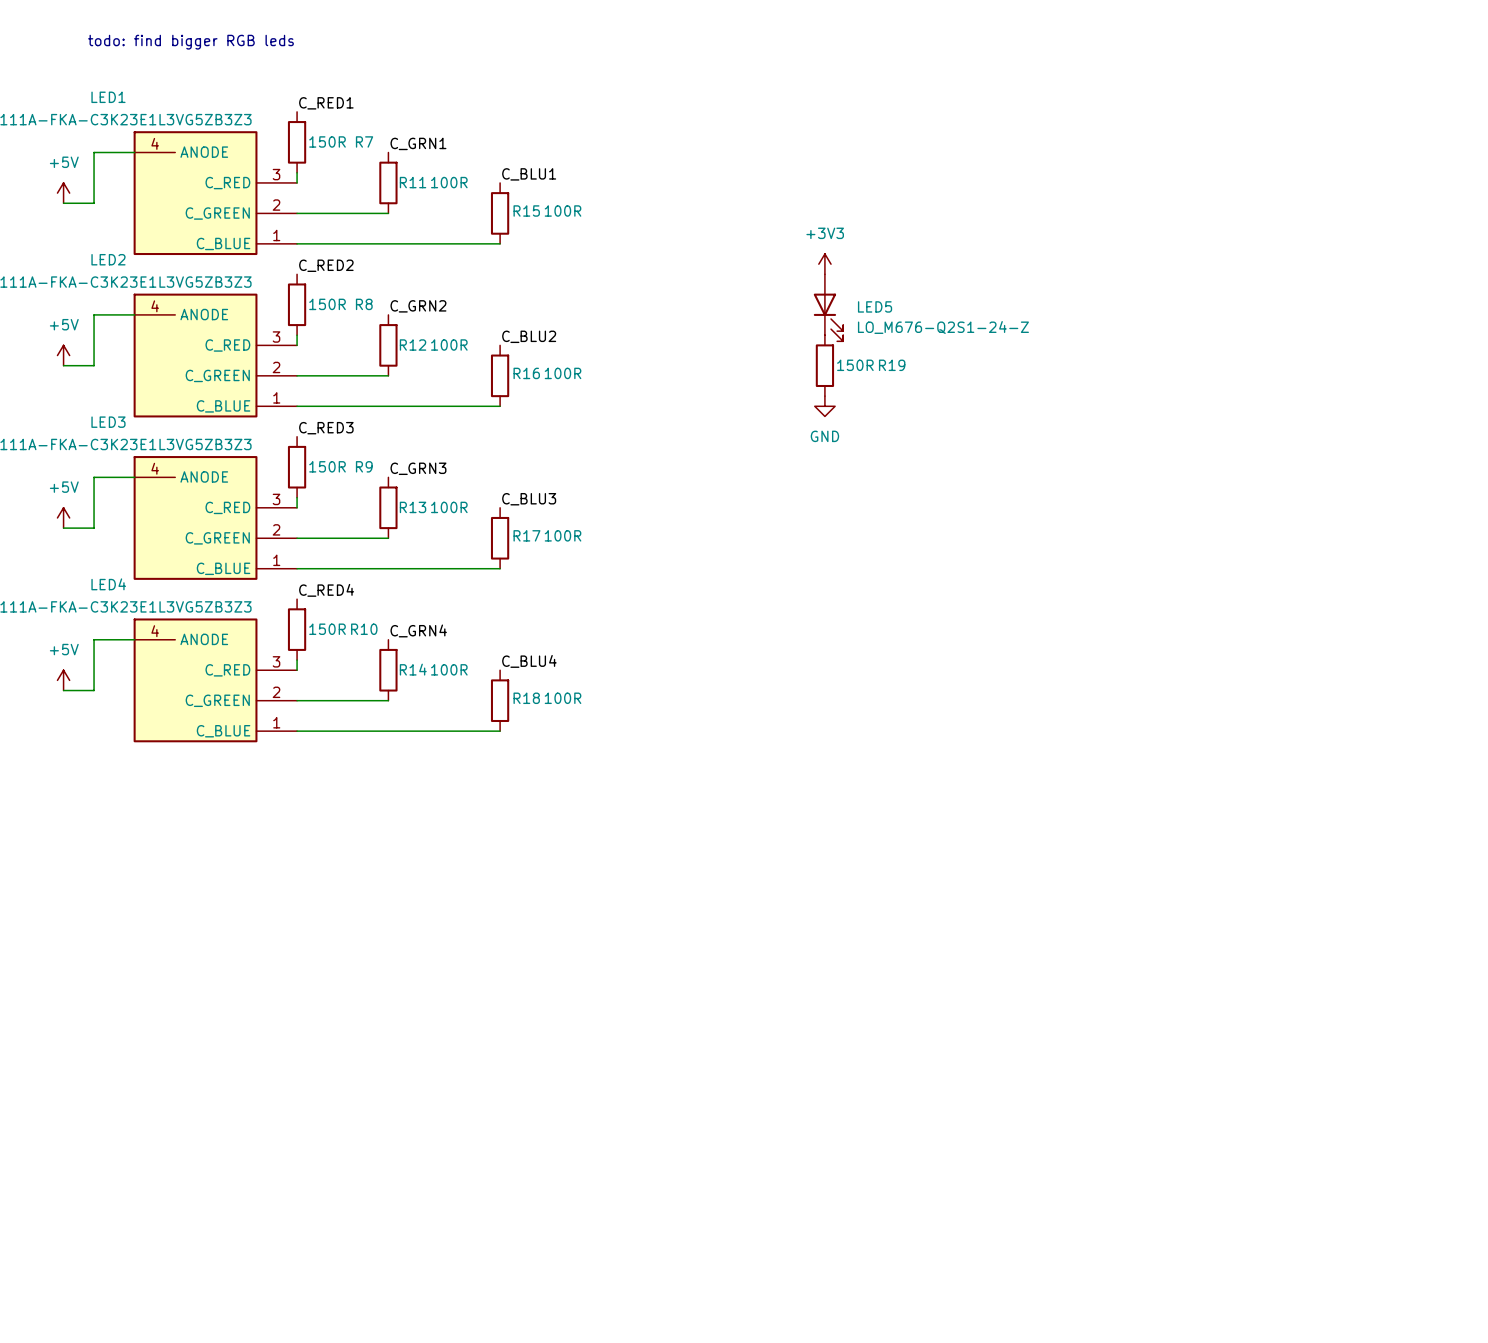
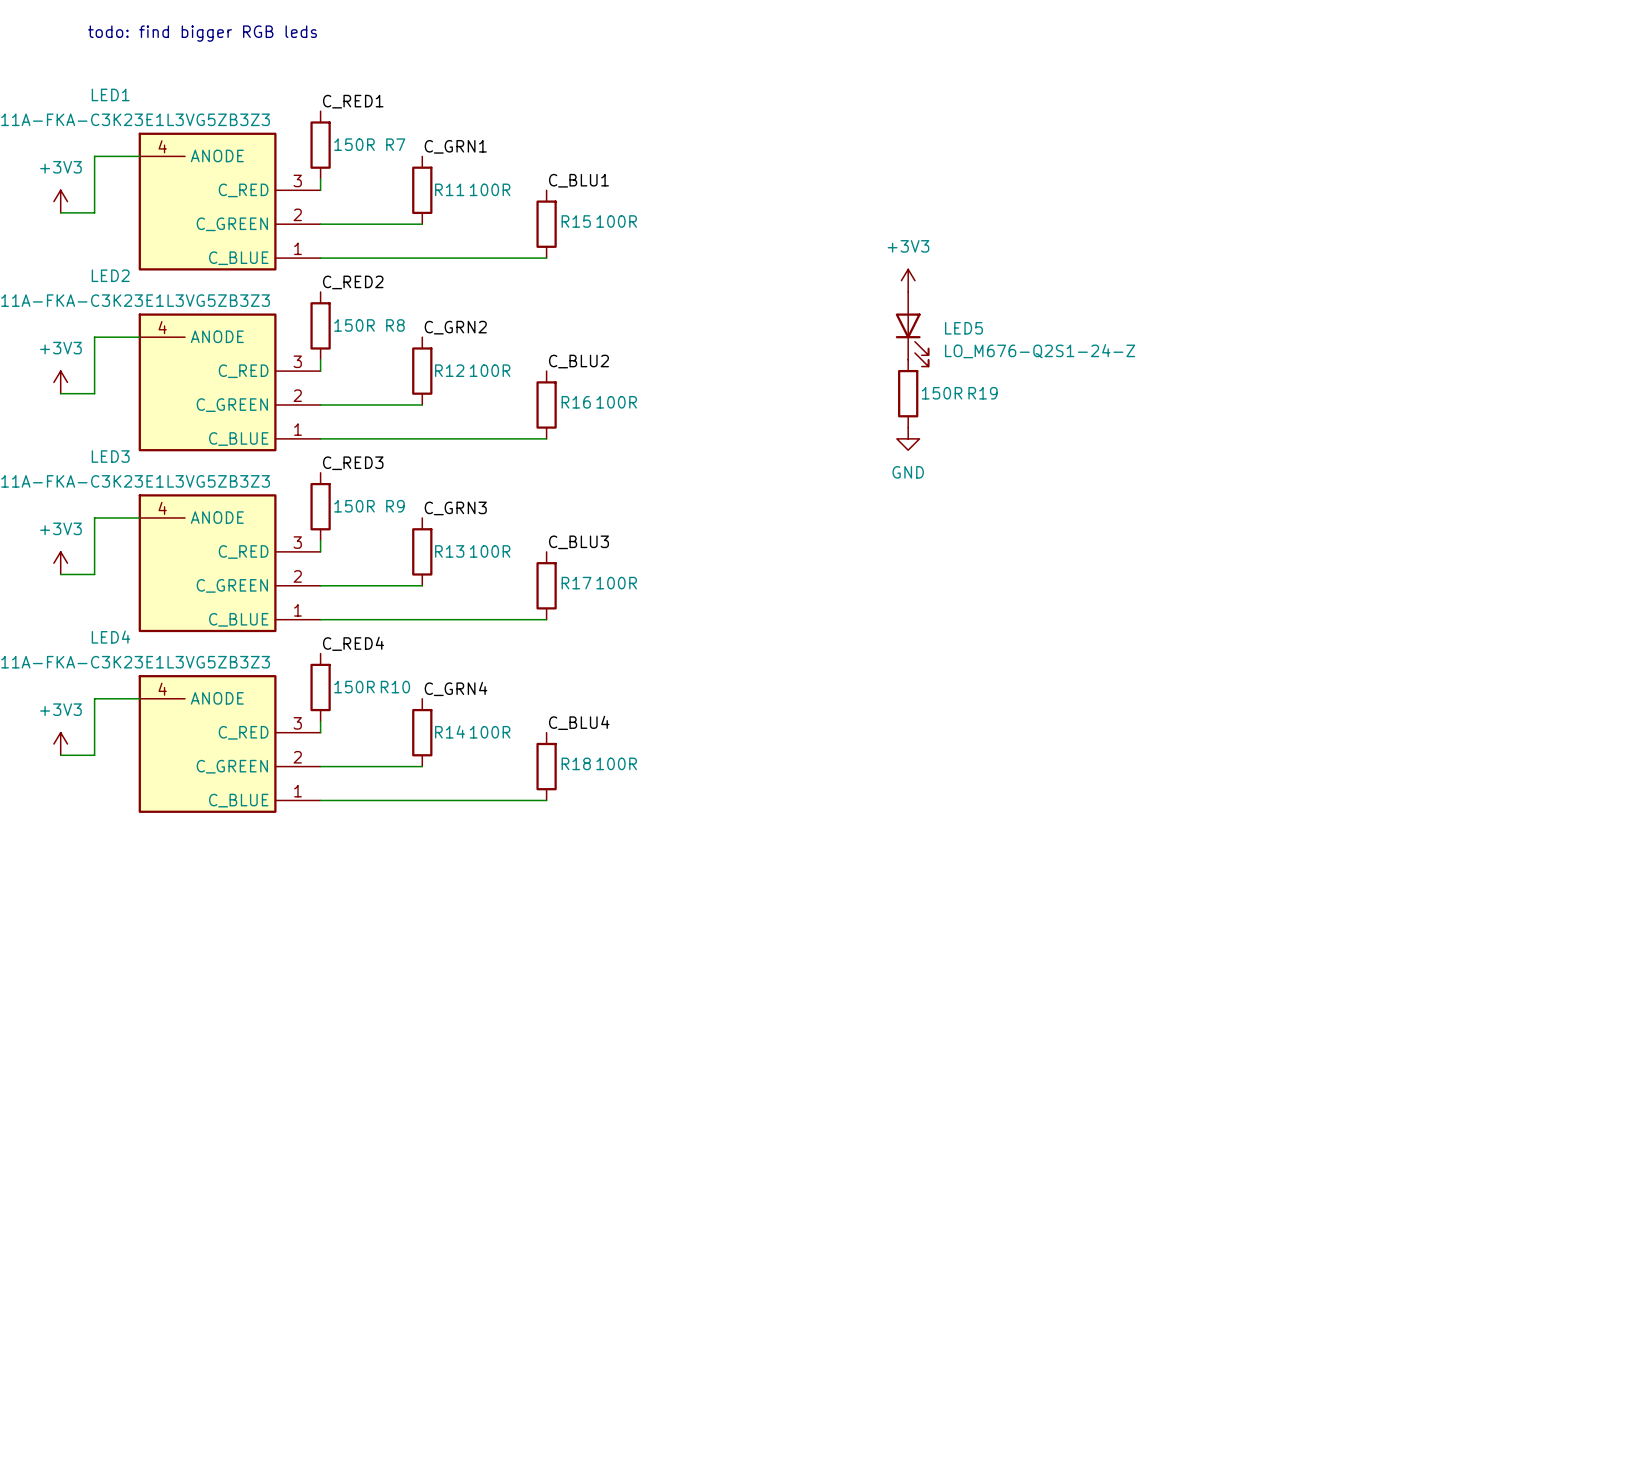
power symbol: +5V (63, 193) -> +3V3 (60, 201)
power symbol: +5V (63, 355) -> +3V3 (60, 382)
power symbol: +5V (63, 517) -> +3V3 (60, 563)
power symbol: +5V (63, 680) -> +3V3 (60, 743)

